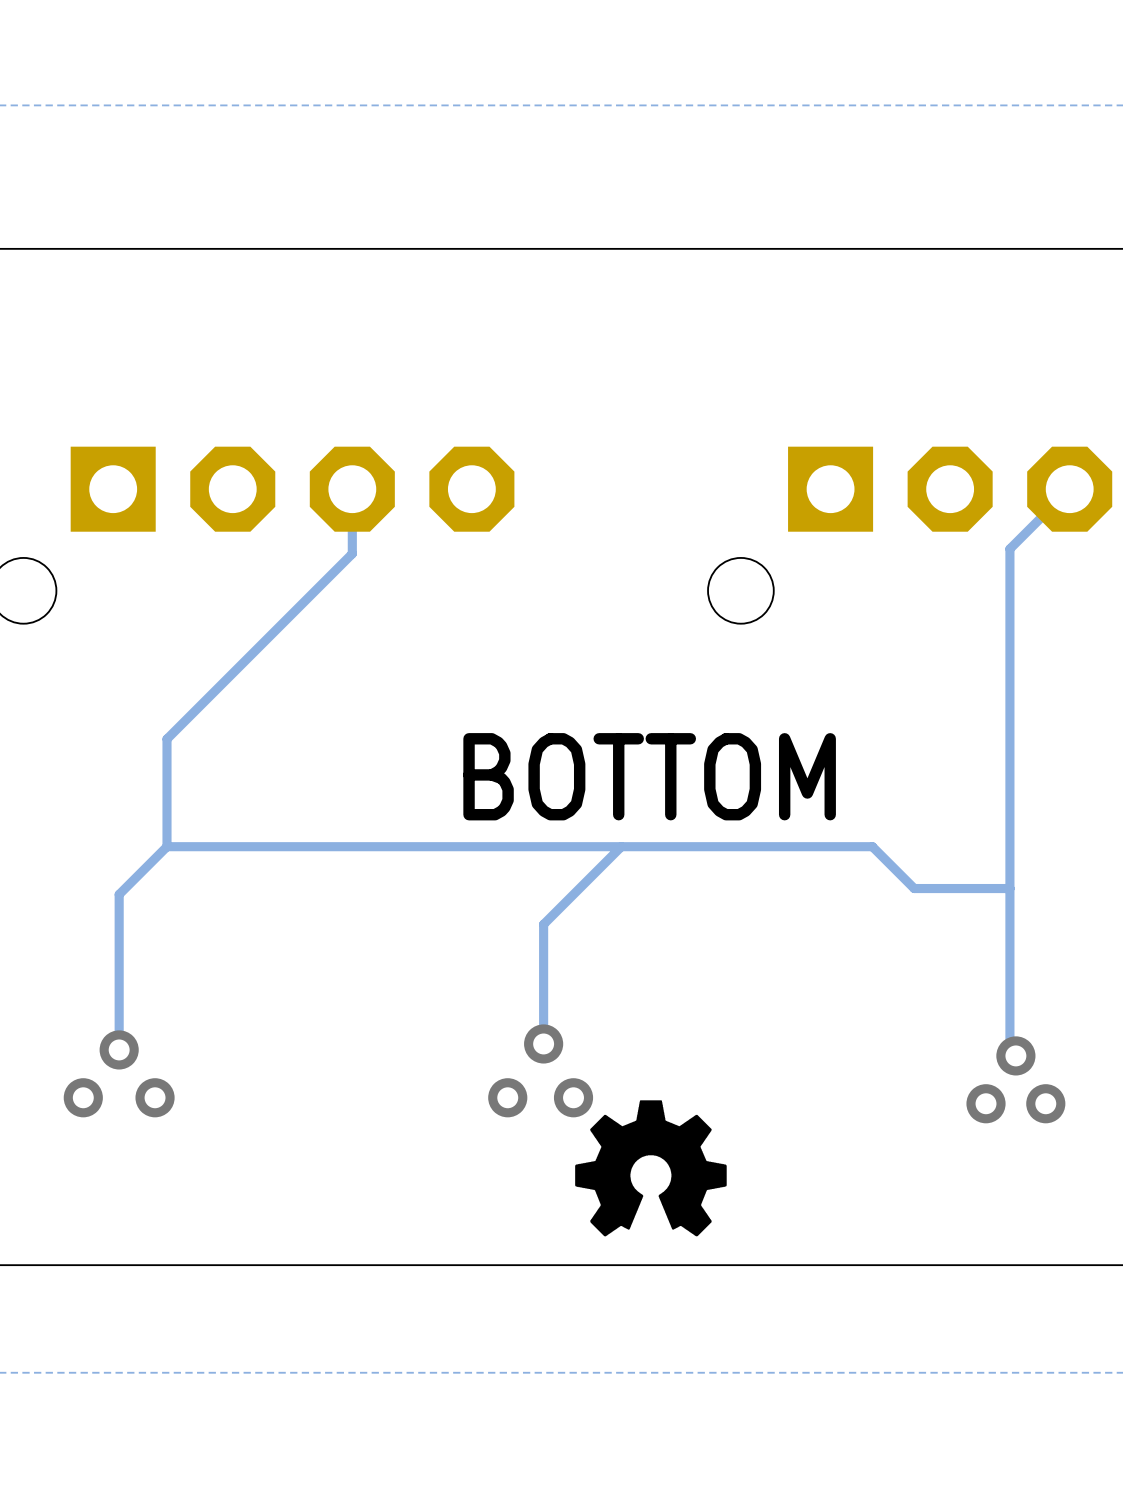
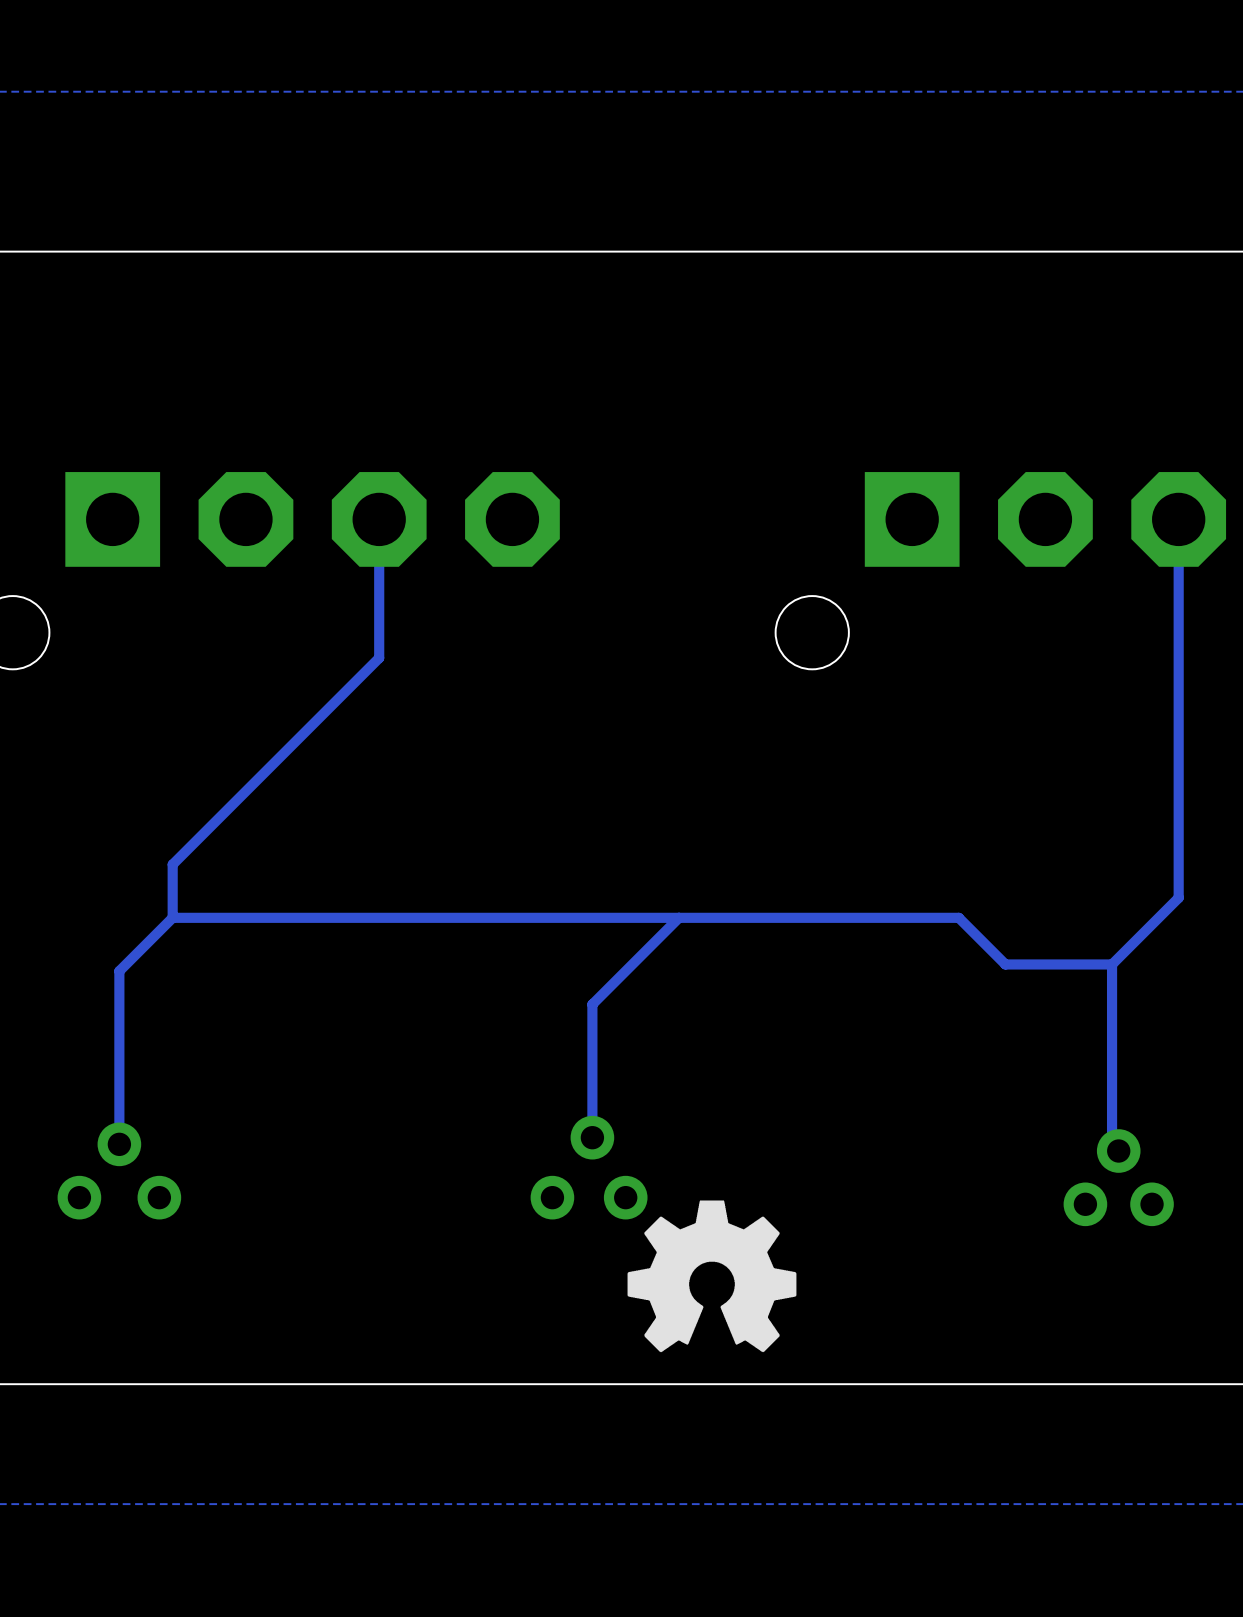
track: (1069, 489) (1009, 548) (1009, 888) -> (1178, 519) (1178, 897) (1112, 964)
track: (352, 553) (167, 739) (167, 798) -> (379, 591) (379, 658) (172, 864)
text: BOTTOM (649, 776) -> none

